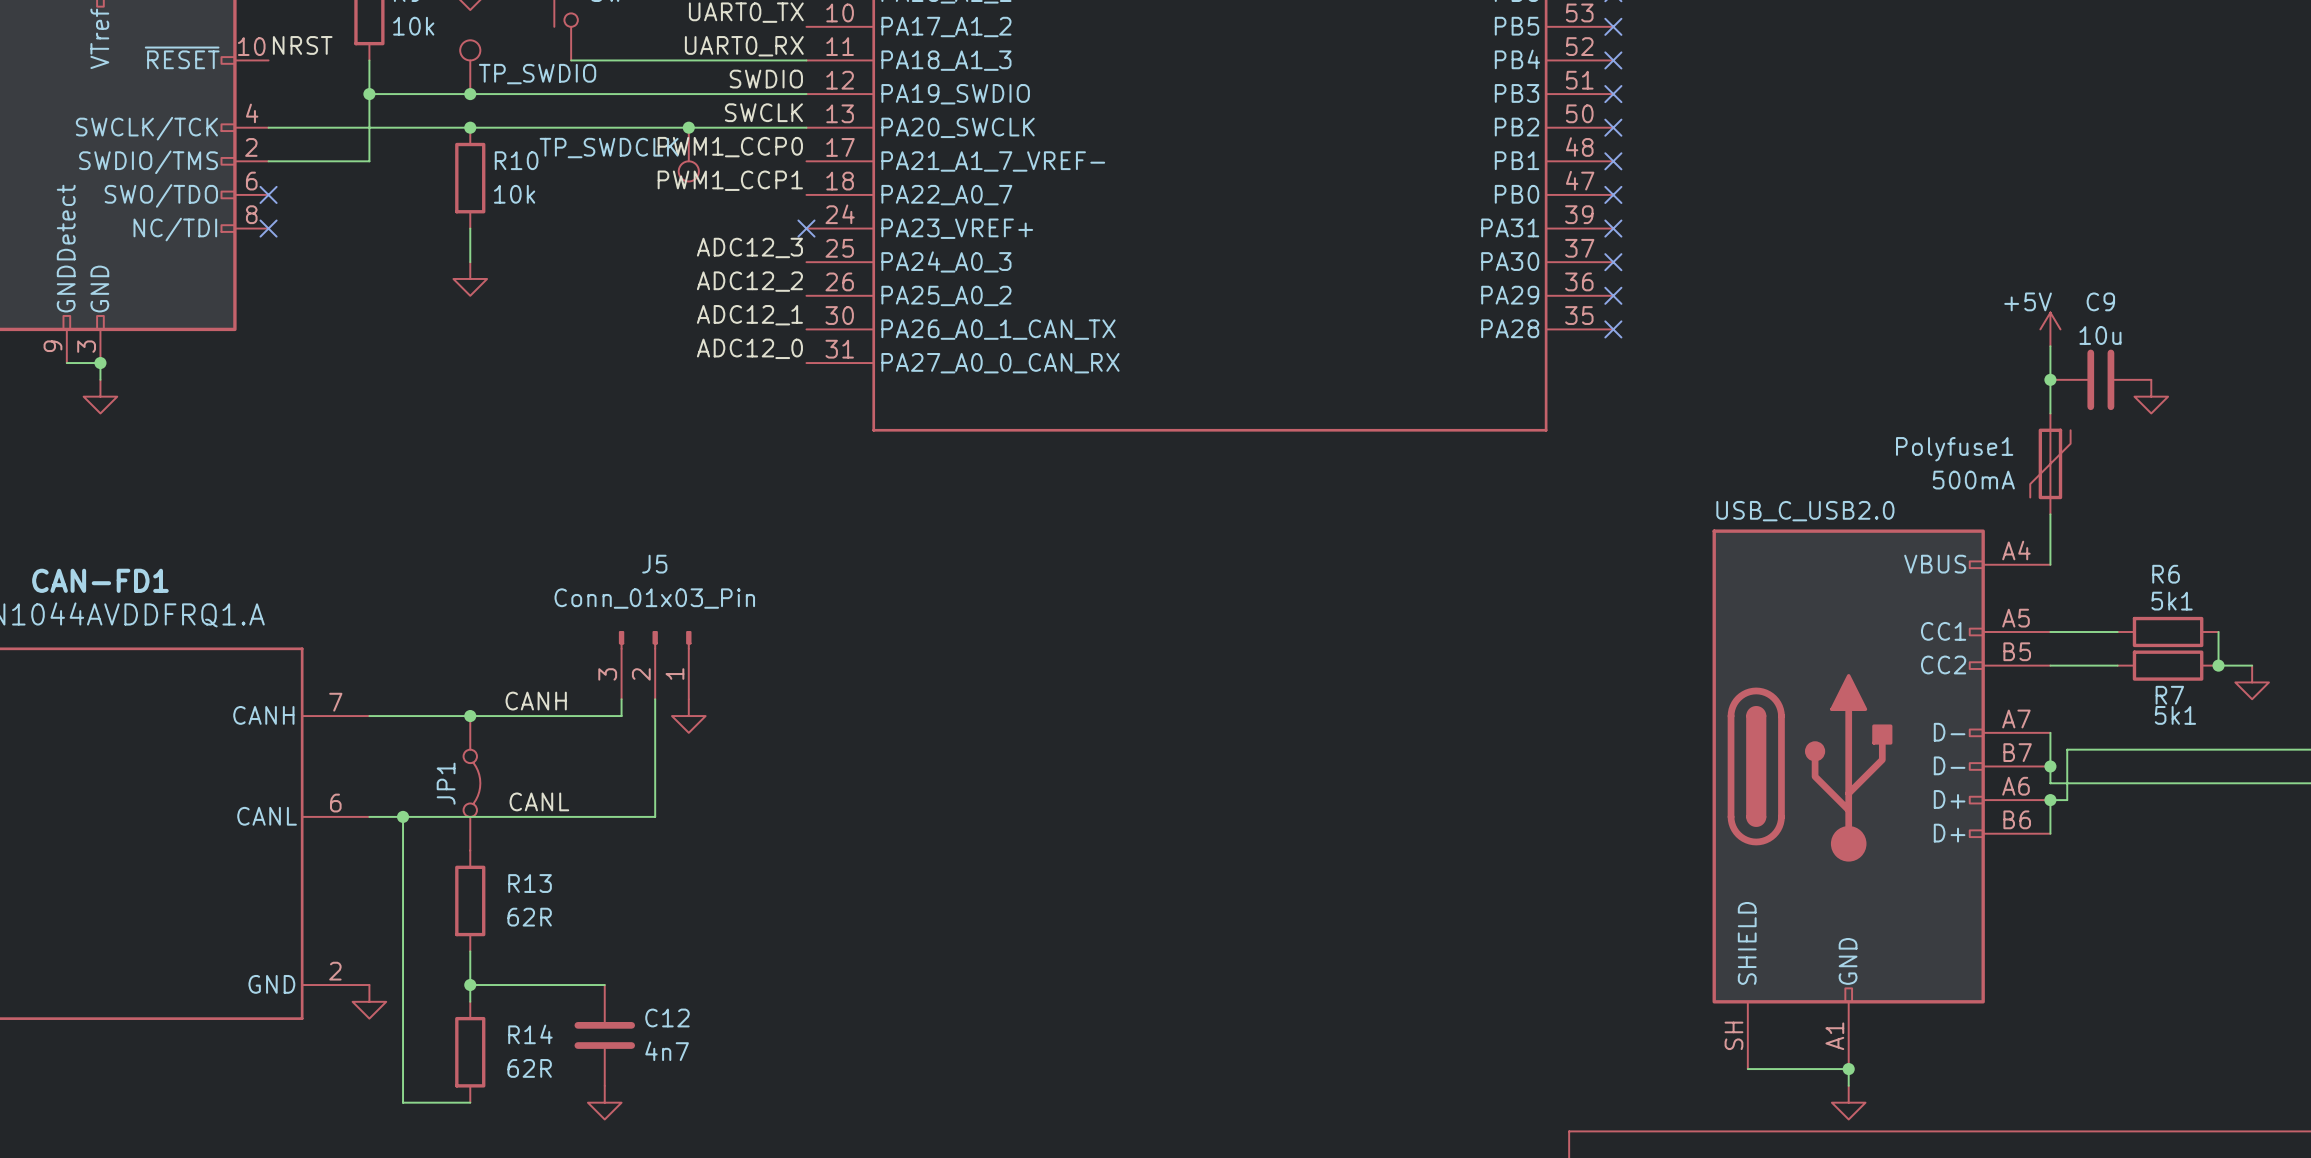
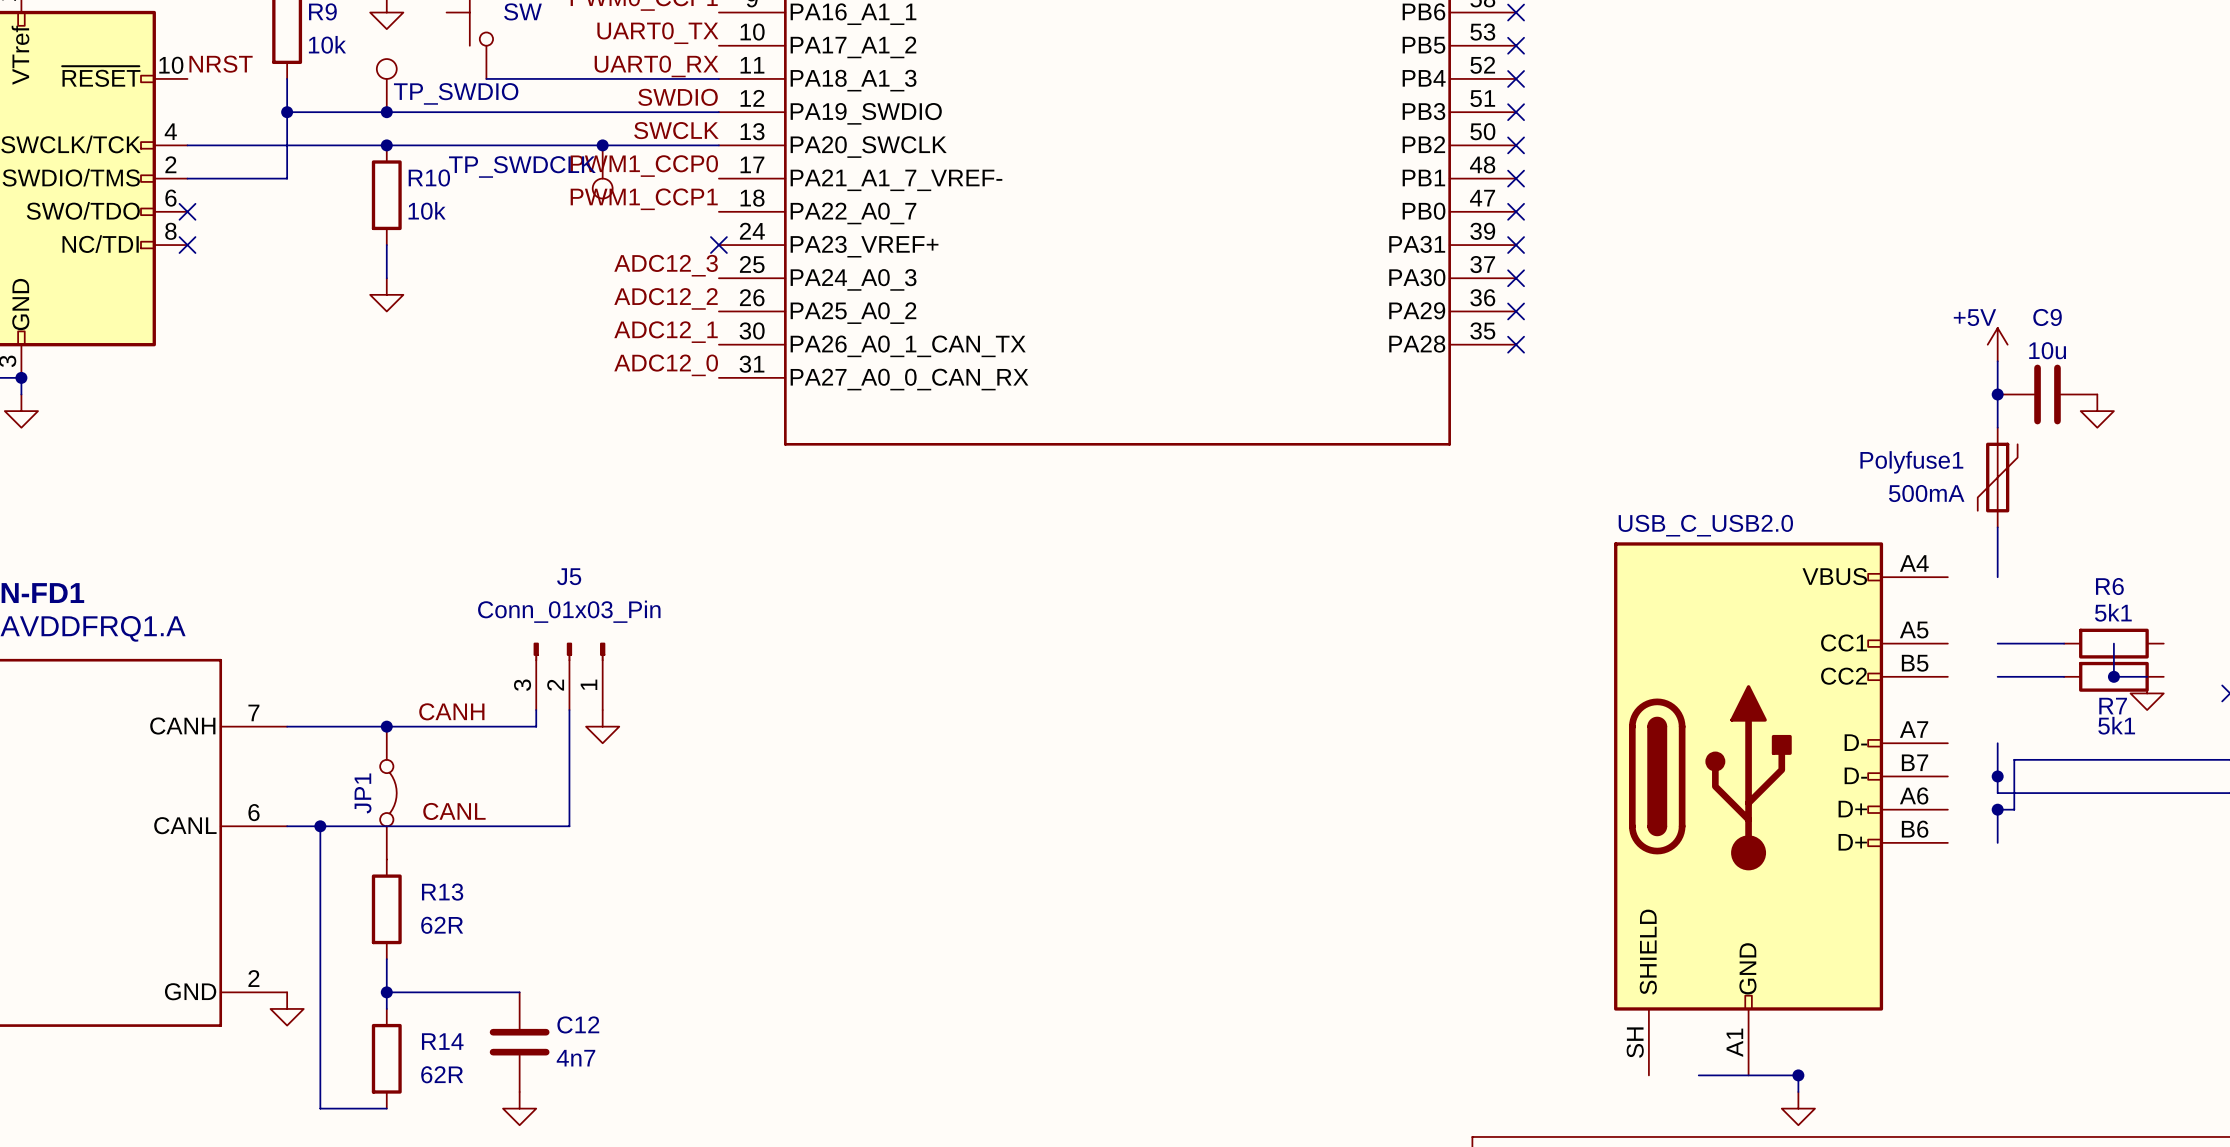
power symbol position: +5V (2050, 329) -> +5V (1997, 344)
wire: (2050, 346) (2050, 413) -> (1997, 361) (1997, 427)
junction position: (2050, 379) -> (1997, 394)
C9 position: (2100, 379) -> (2047, 394)
power symbol position: (2151, 396) -> (2097, 411)
Polyfuse1 position: (2050, 463) -> (1997, 477)
wire: (2050, 514) (2050, 564) -> (1997, 527) (1997, 577)
wire: (2050, 632) (2100, 632) -> (2014, 643) (2064, 643)
R6 position: (2168, 632) -> (2113, 643)
wire: (2050, 665) (2100, 665) -> (2014, 676) (2064, 676)
R7 position: (2168, 665) -> (2113, 676)
wire: (2050, 732) (2050, 783) (2100, 783) -> (1997, 743) (1997, 793)
wire: (2117, 749) (2067, 749) (2067, 800) (2050, 800) (2050, 833) -> (2014, 759) (2014, 809) (1997, 809) (1997, 842)
junction: (2050, 766) -> none
junction: none -> (1997, 776)
junction: (2050, 800) -> none
junction: none -> (1997, 809)
wire: (1747, 1069) (1798, 1069) -> none
wire: (1848, 1069) (1848, 1085) -> (1748, 1075) (1798, 1075) (1798, 1092)
junction position: (1848, 1069) -> (1798, 1075)
power symbol position: (1848, 1102) -> (1798, 1108)

